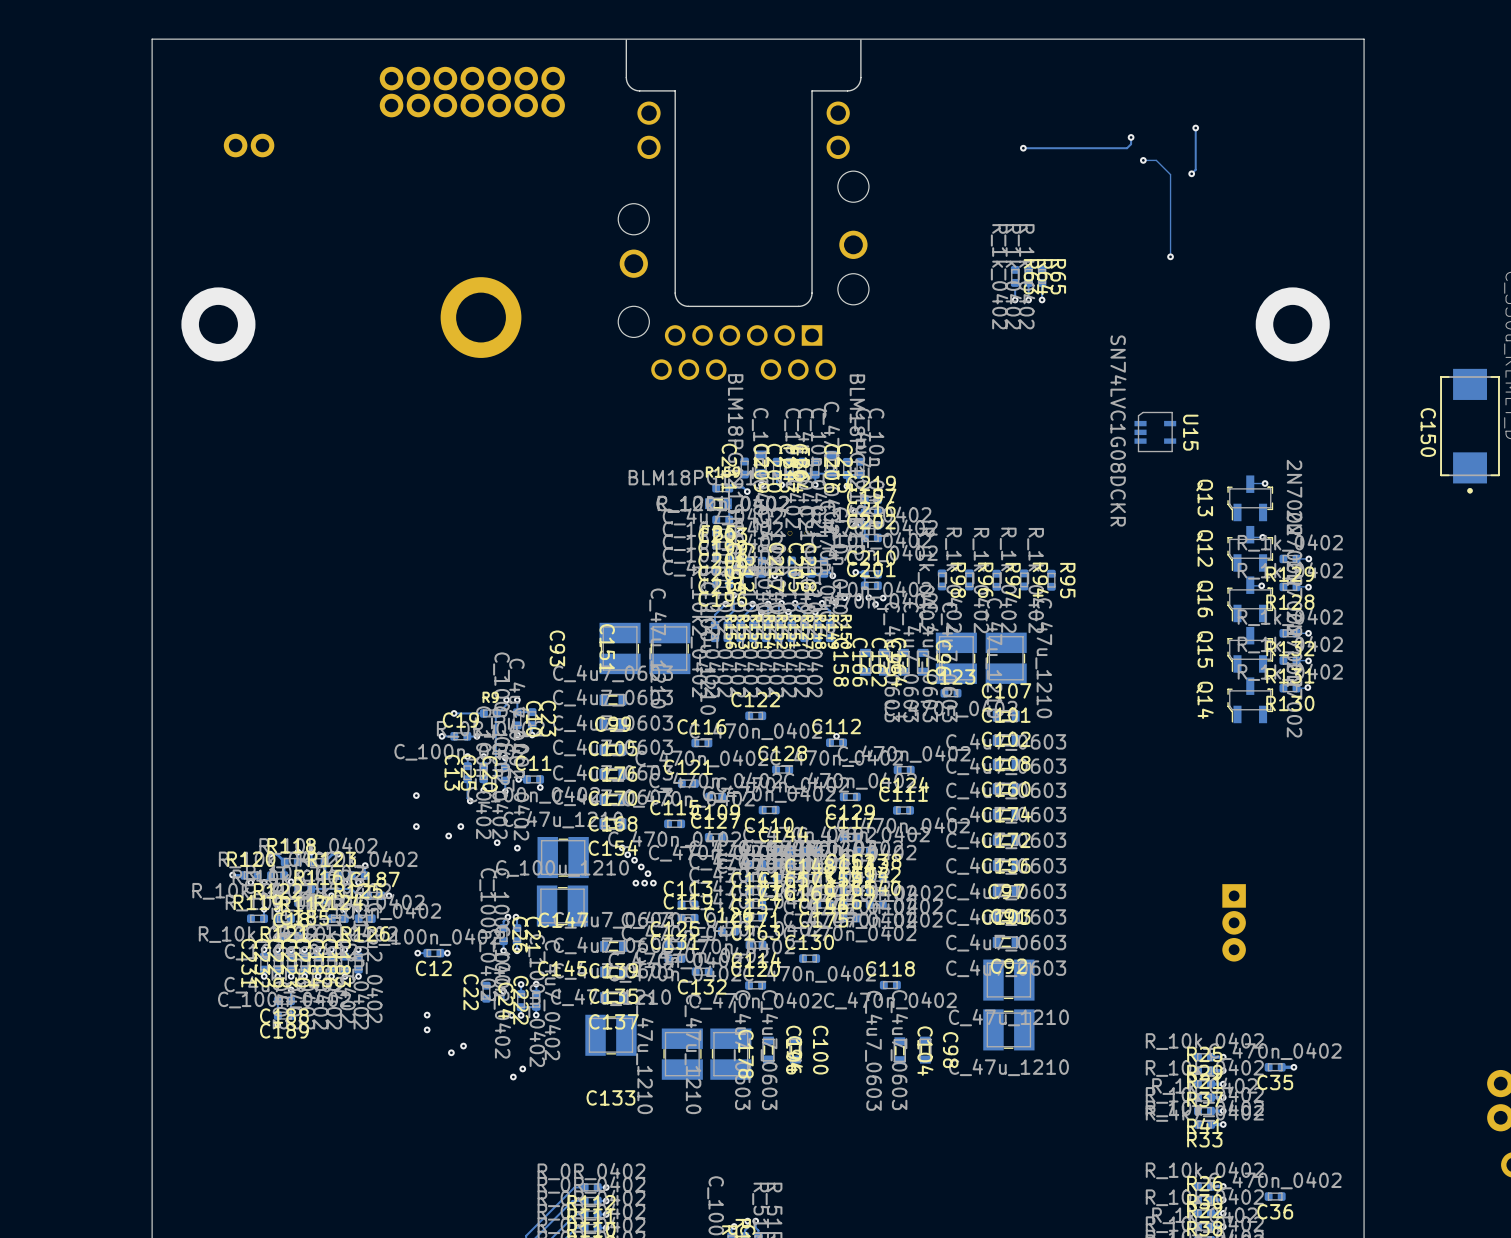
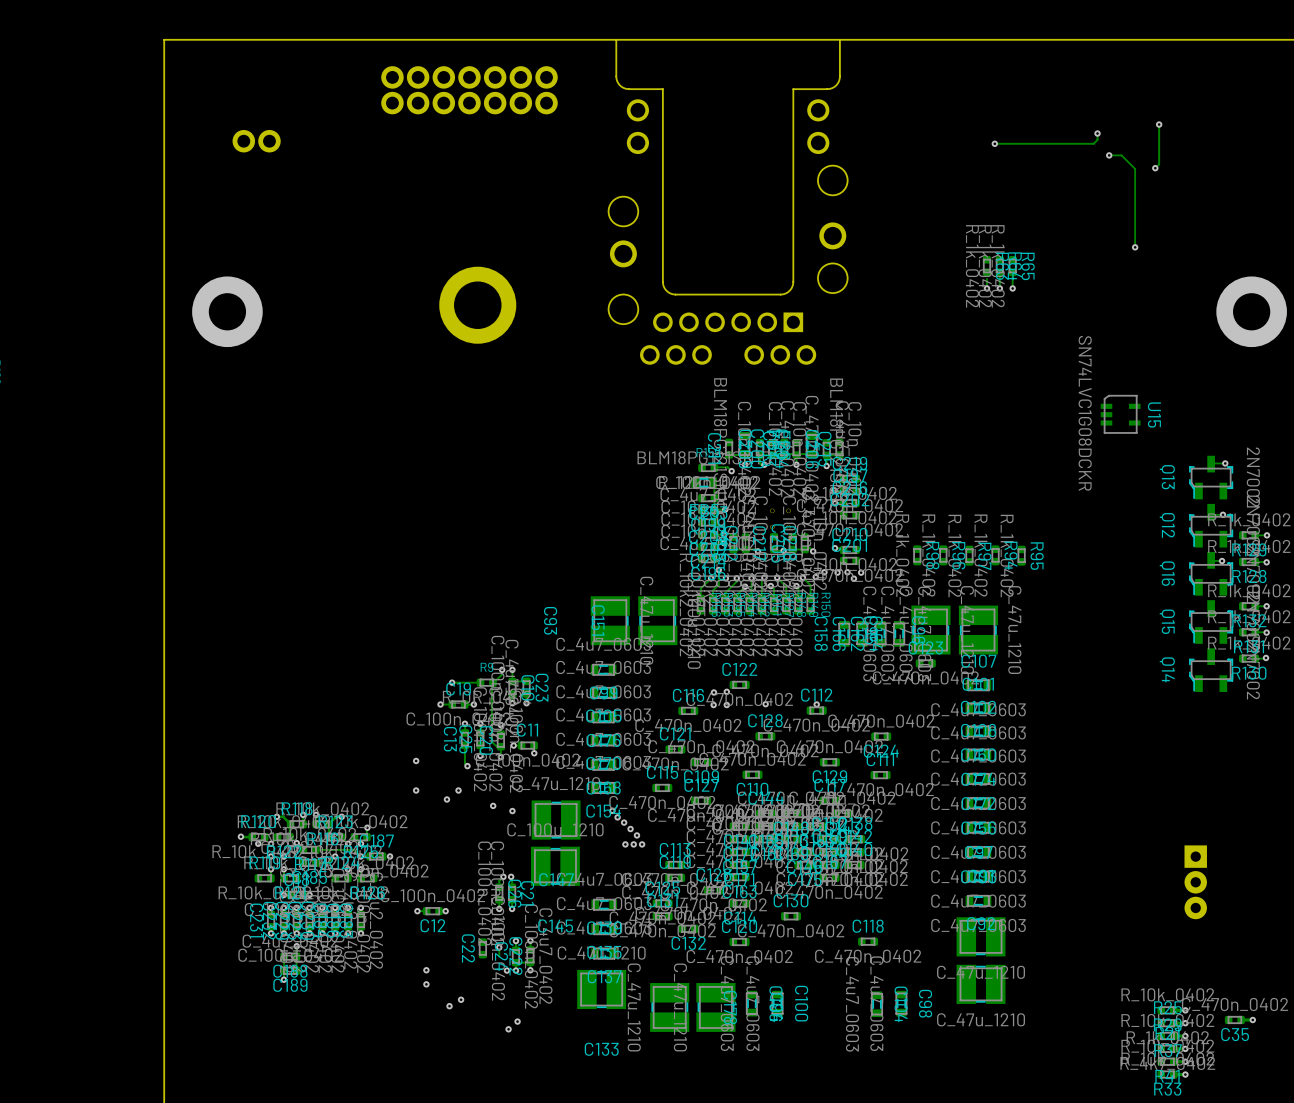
via: none -> (713, 692)
via: none -> (726, 691)
via: none -> (713, 705)
via: none -> (726, 705)
via: none -> (765, 704)

